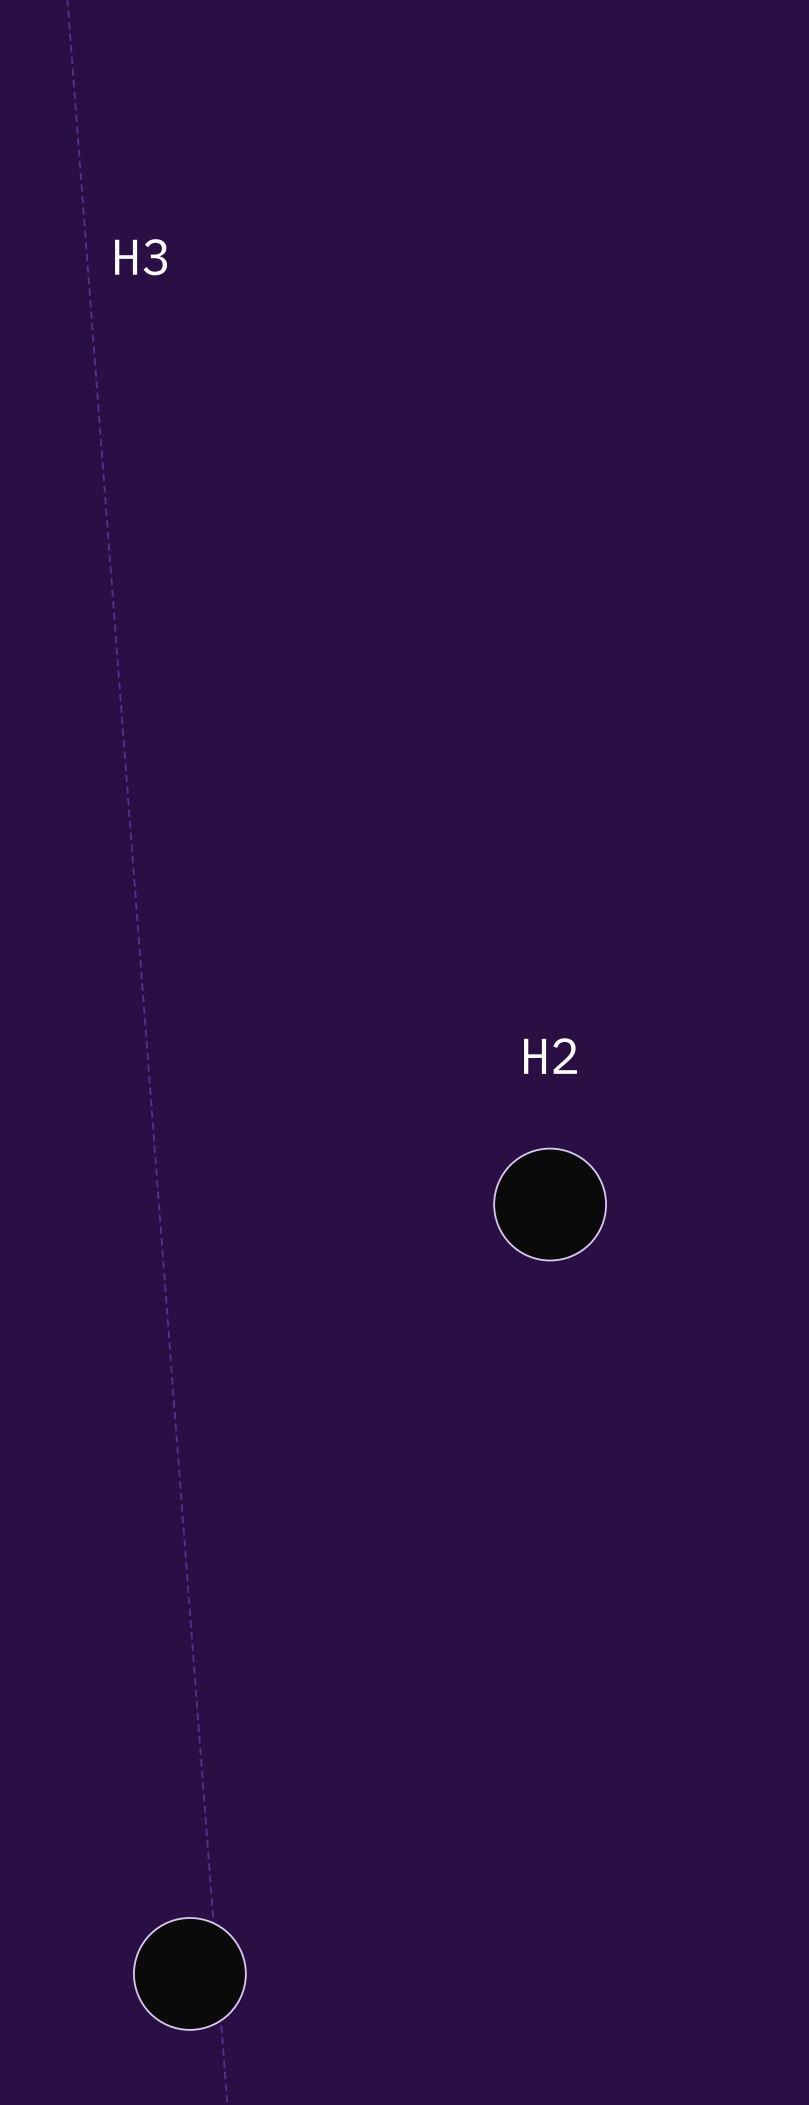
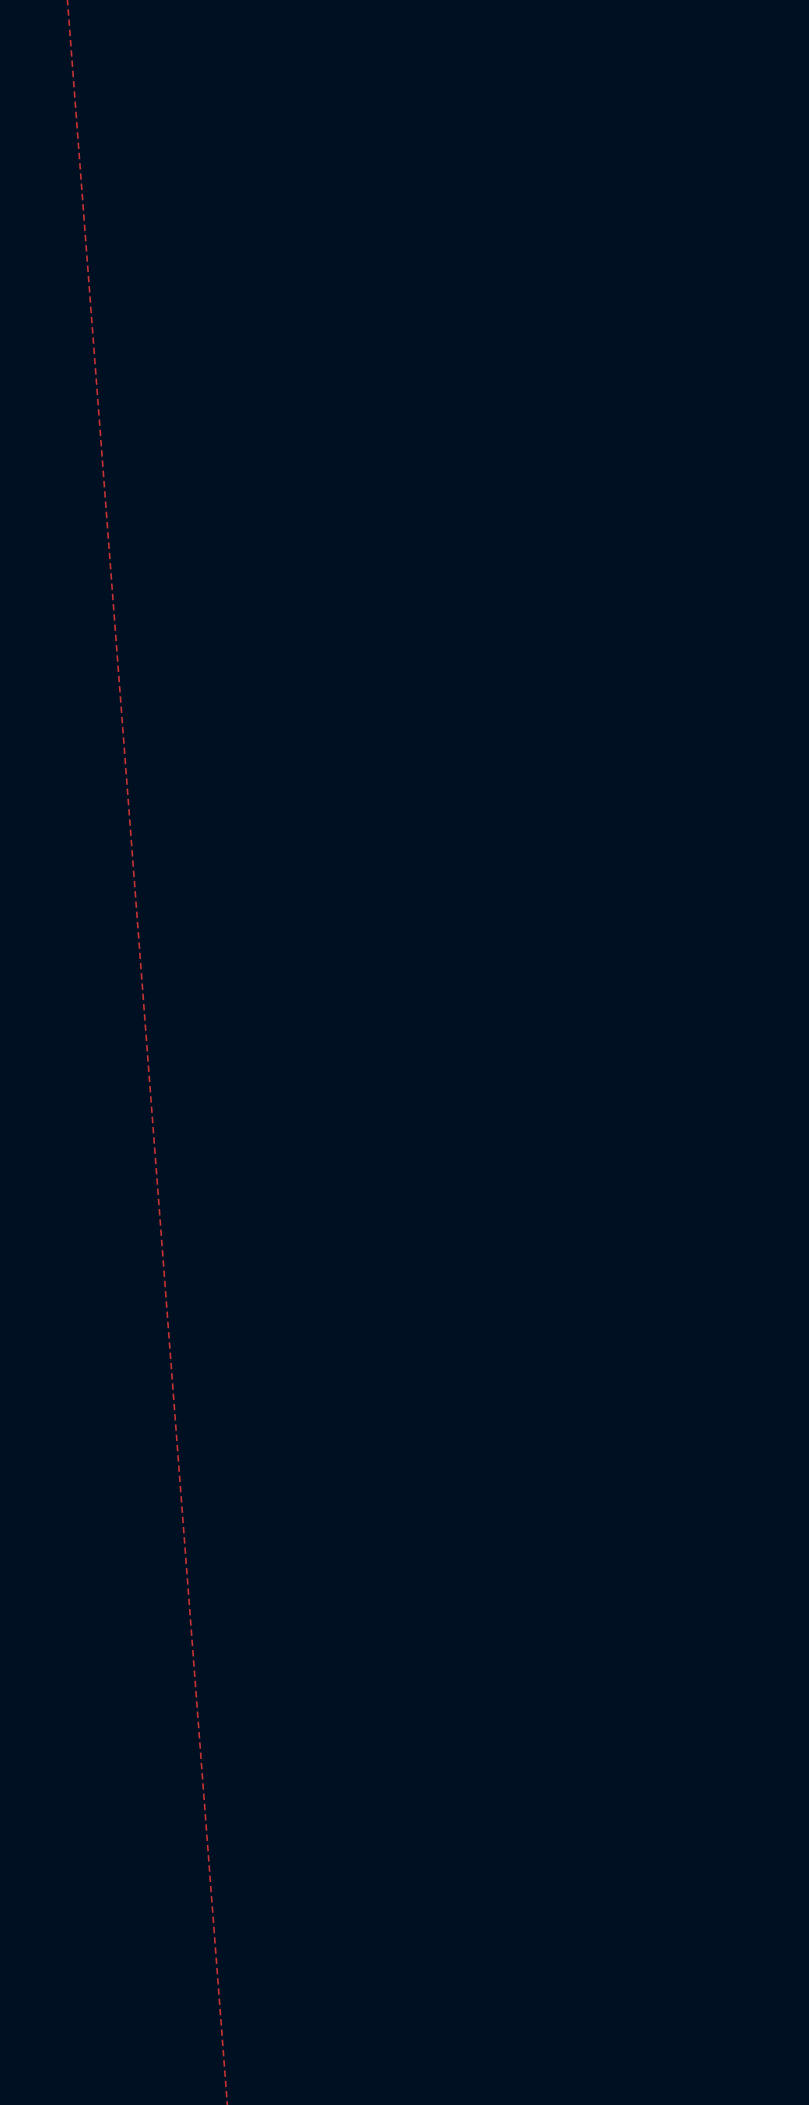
H2: (550, 1204) -> none
H3: (189, 1973) -> none

